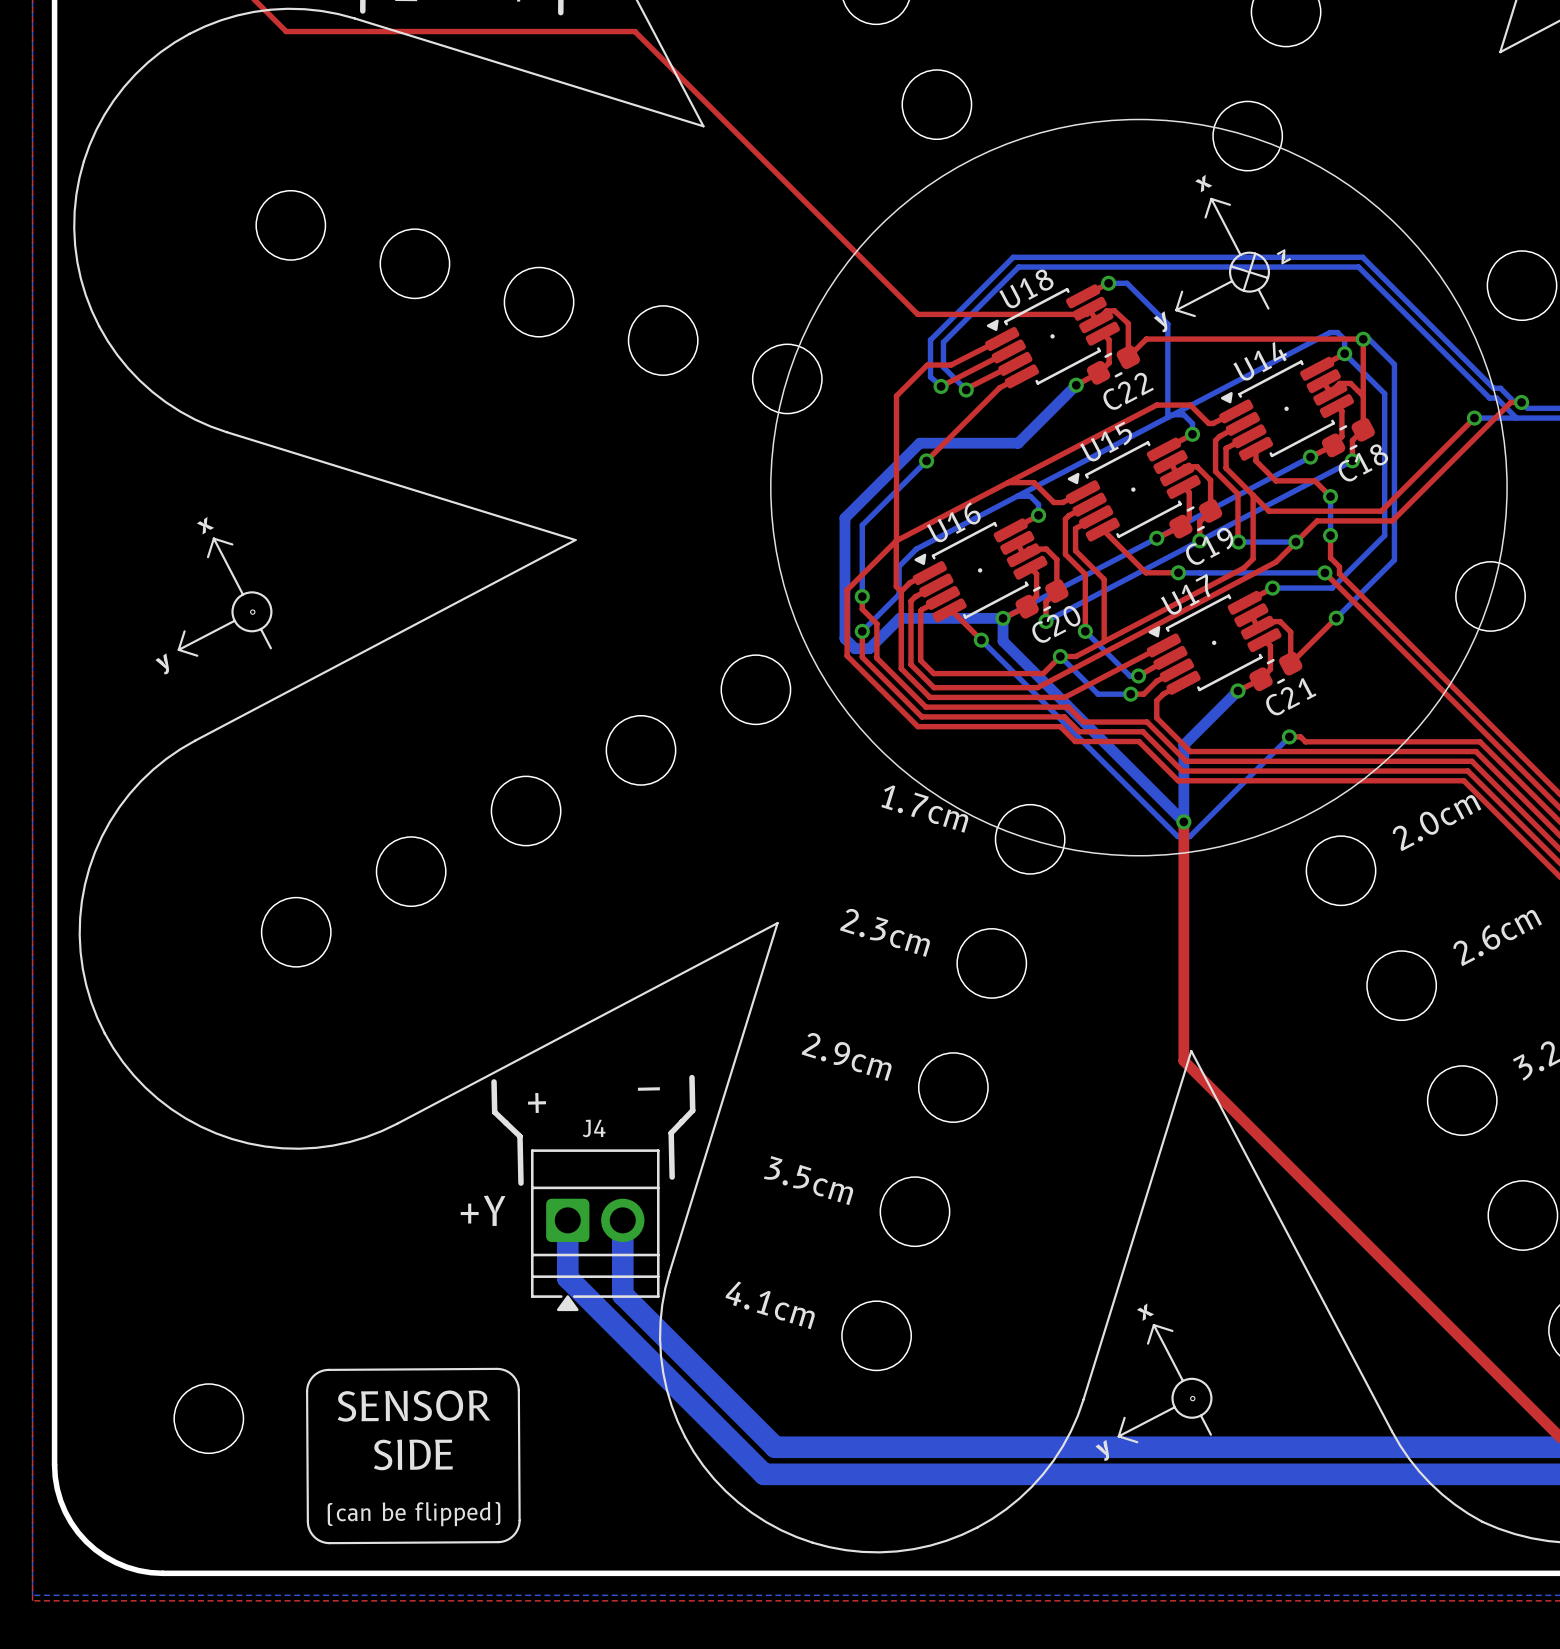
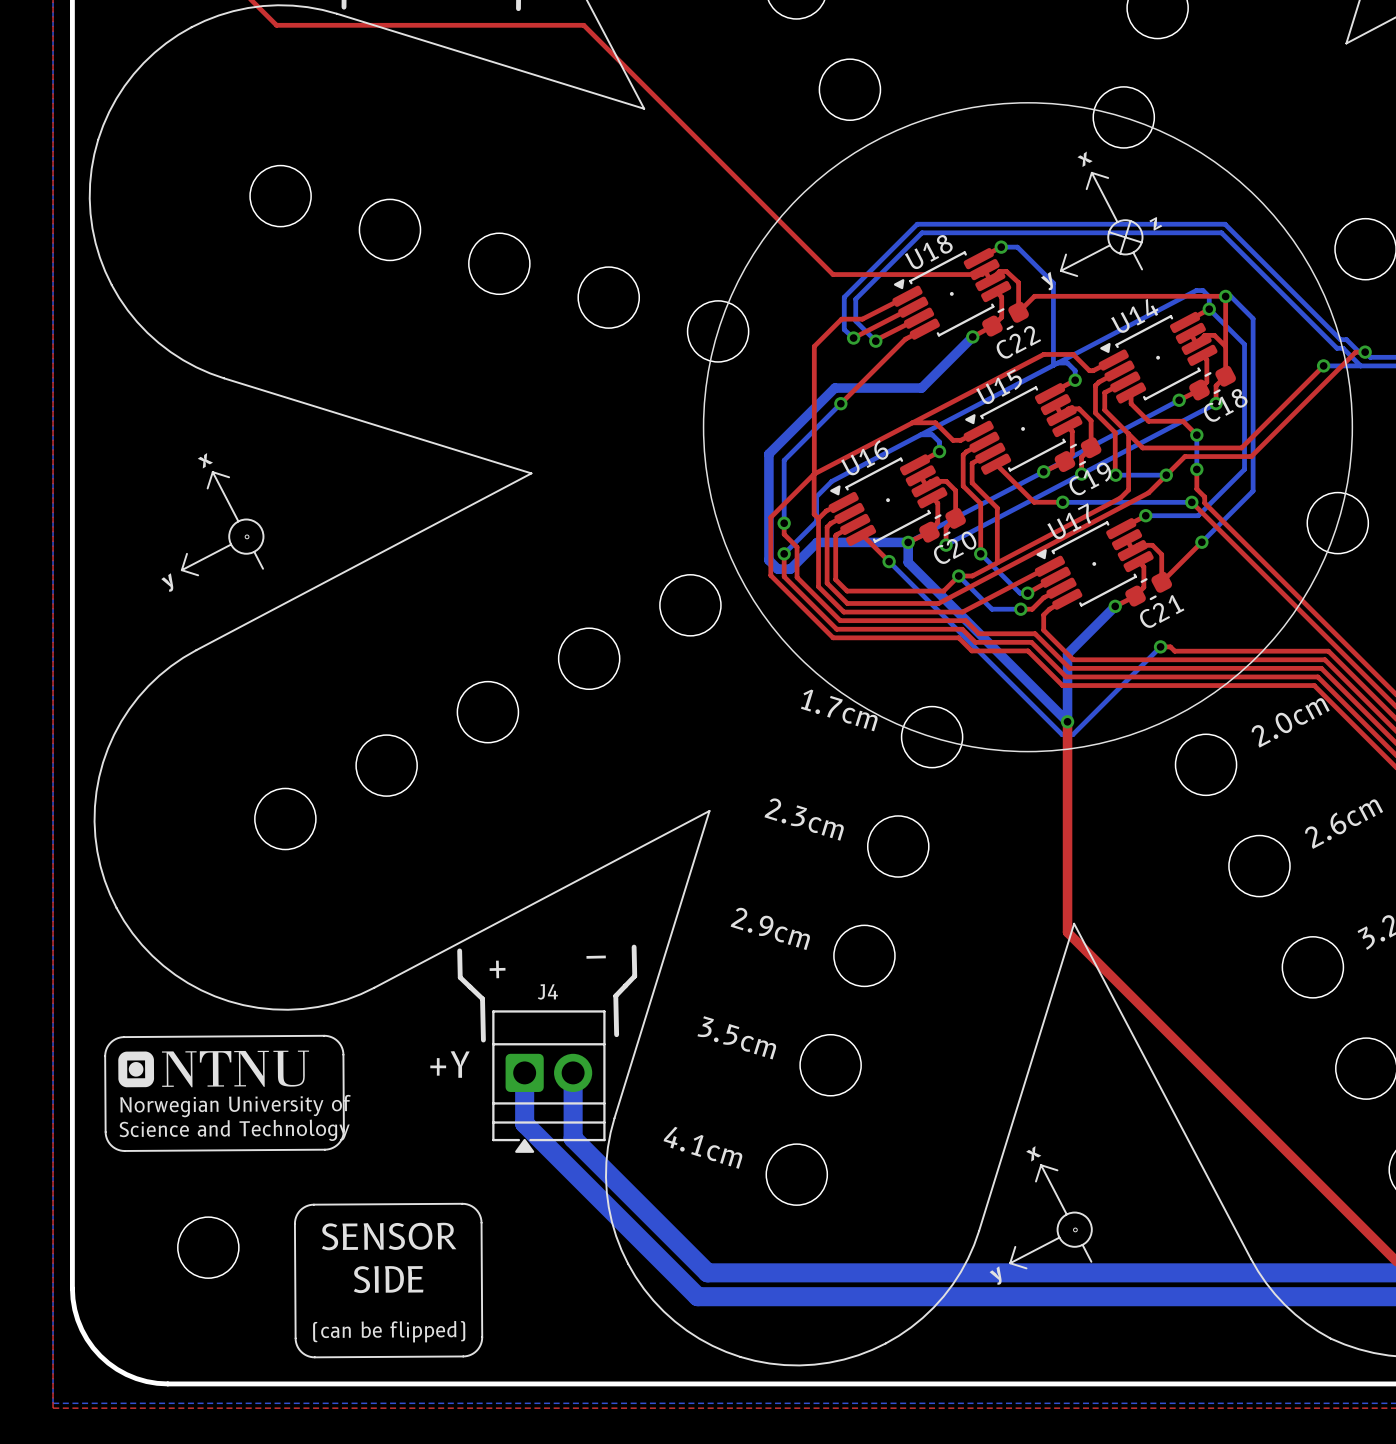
line: none -> (324, 1035) (124, 1037) (115, 1039) (108, 1046) (105, 1054) (105, 1132) (107, 1140) (114, 1148) (124, 1150) (324, 1149) (333, 1147) (339, 1142) (343, 1132) (343, 1052) (337, 1041) (324, 1035)
drawing: none -> [118, 1050, 310, 1088]
text: none -> Norwegian University of (235, 1106)
text: none -> Science and Technology (234, 1130)

